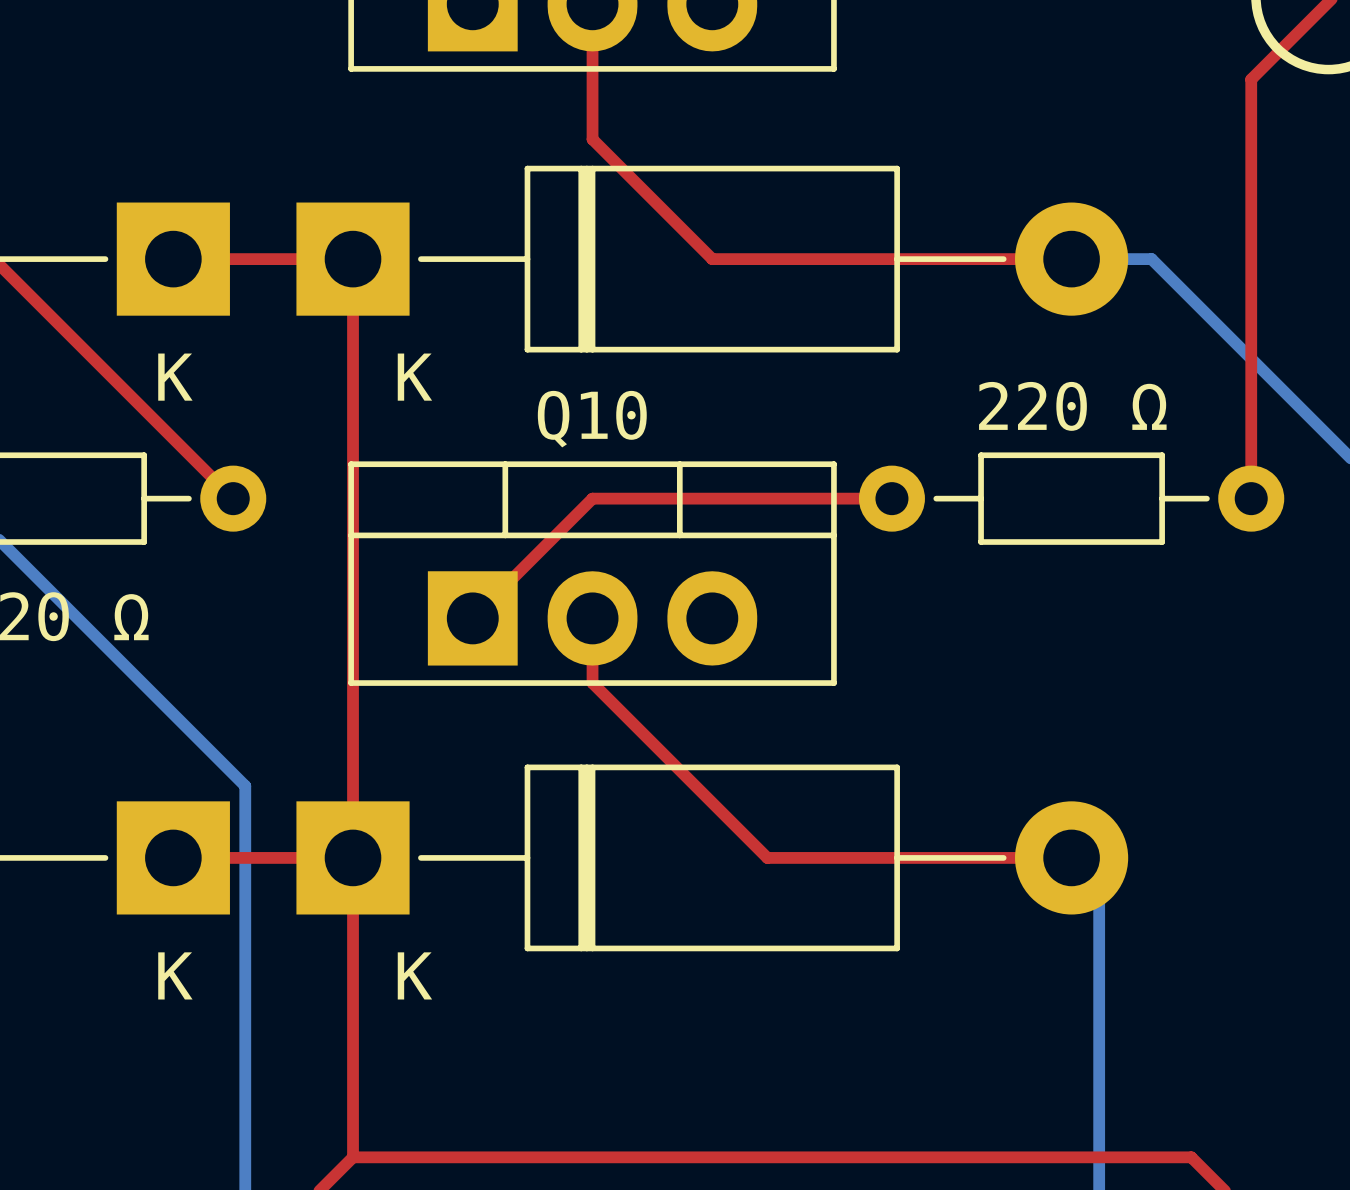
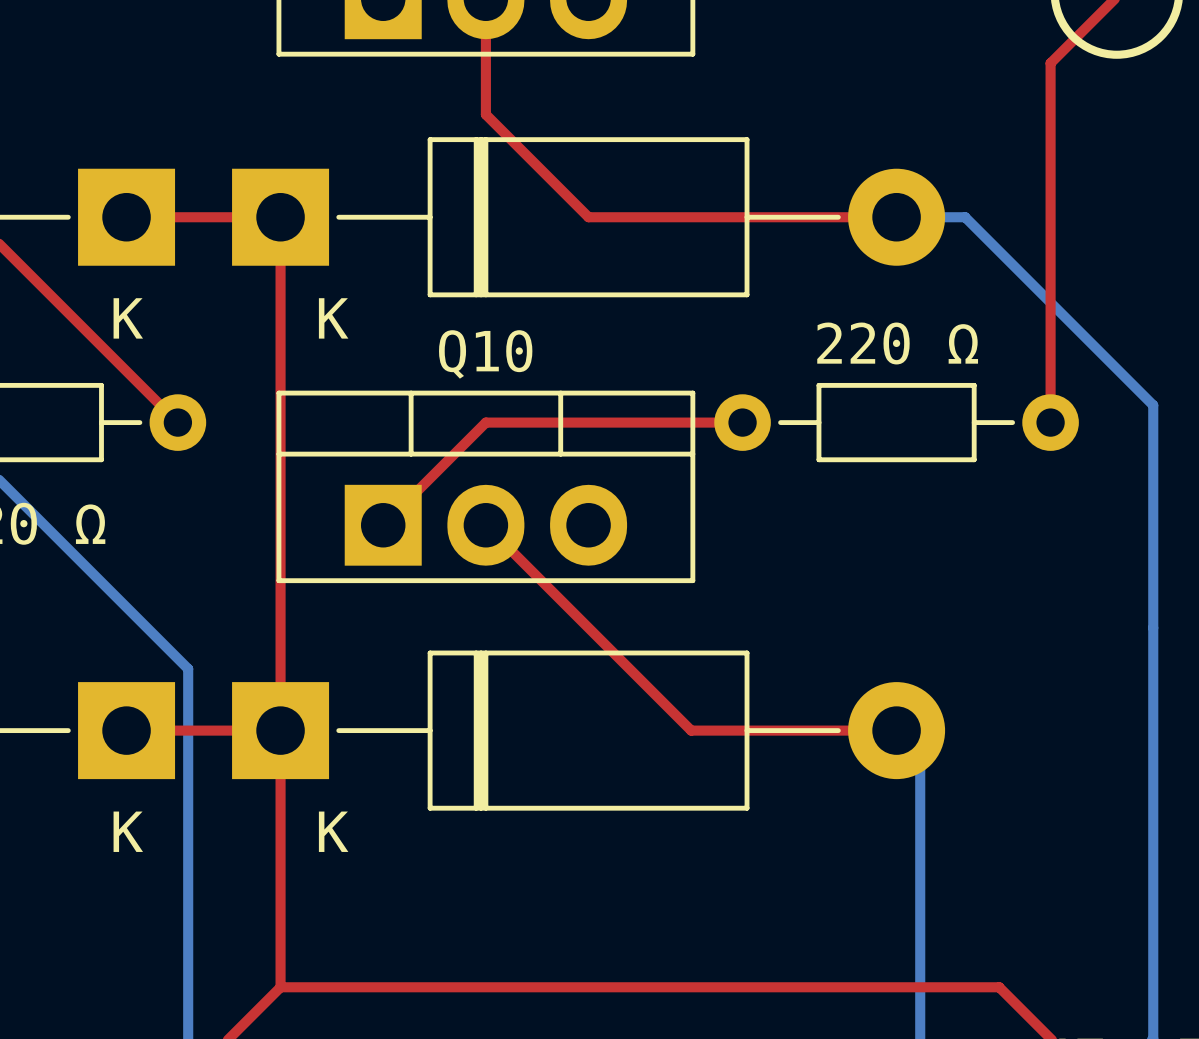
top track: (592, 618) (592, 683) (767, 857) (832, 857) -> (485, 525) (691, 730)

